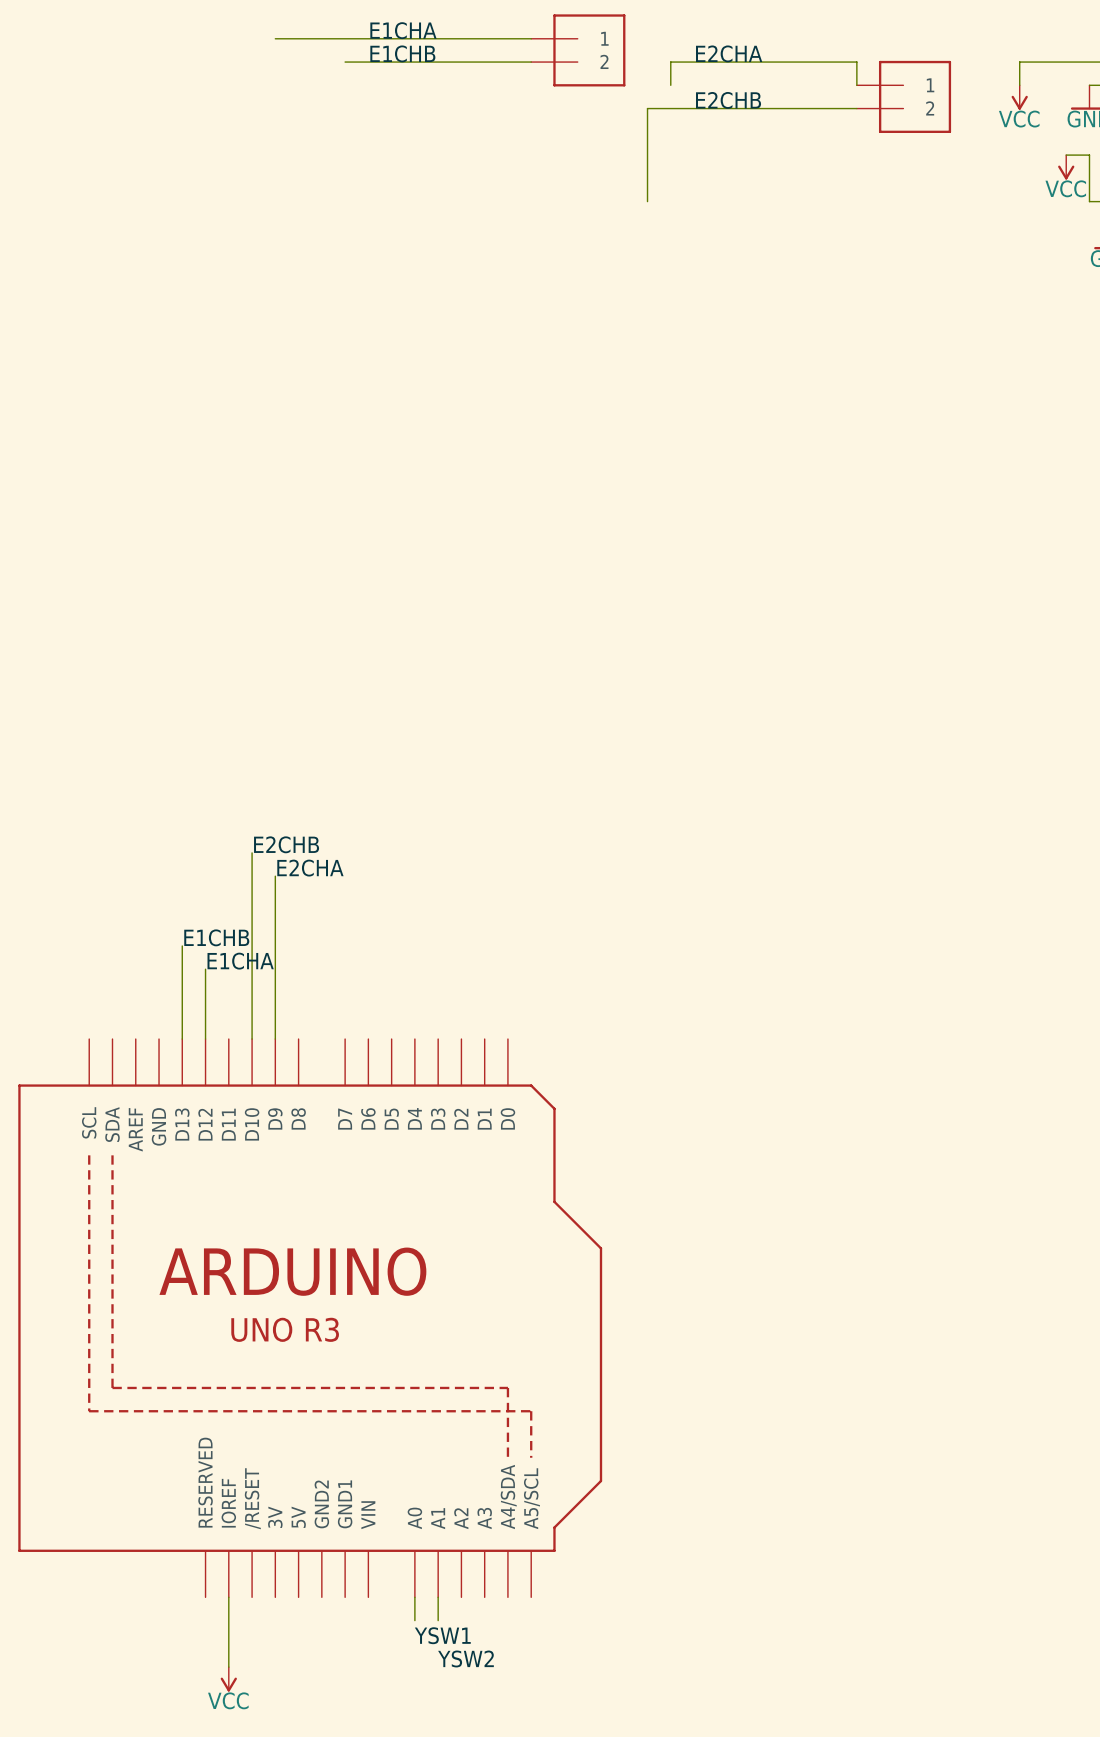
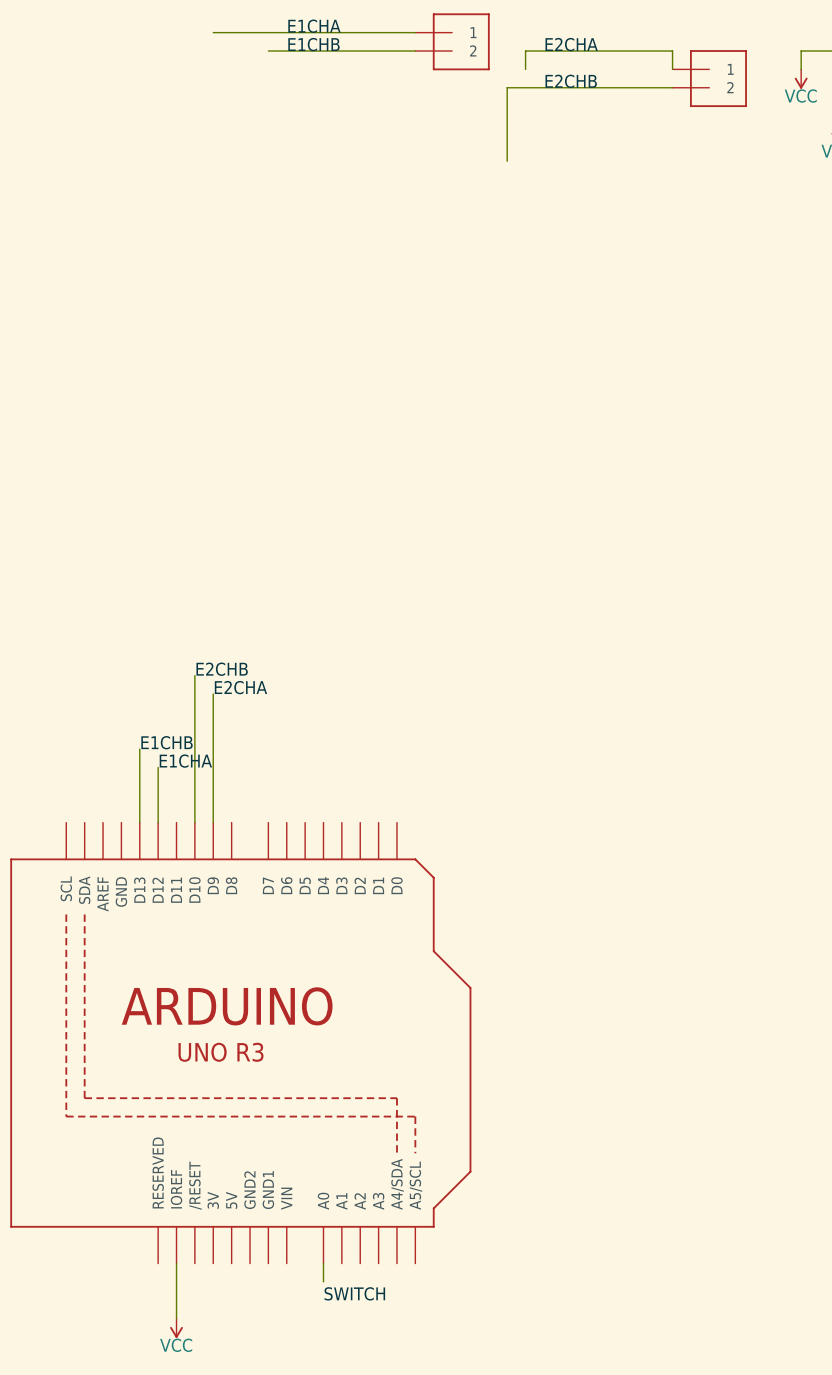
wire: (438, 1597) (438, 1620) -> none
label: YSW1 (442, 1635) -> SWITCH (354, 1293)
label: YSW2 (465, 1658) -> none

